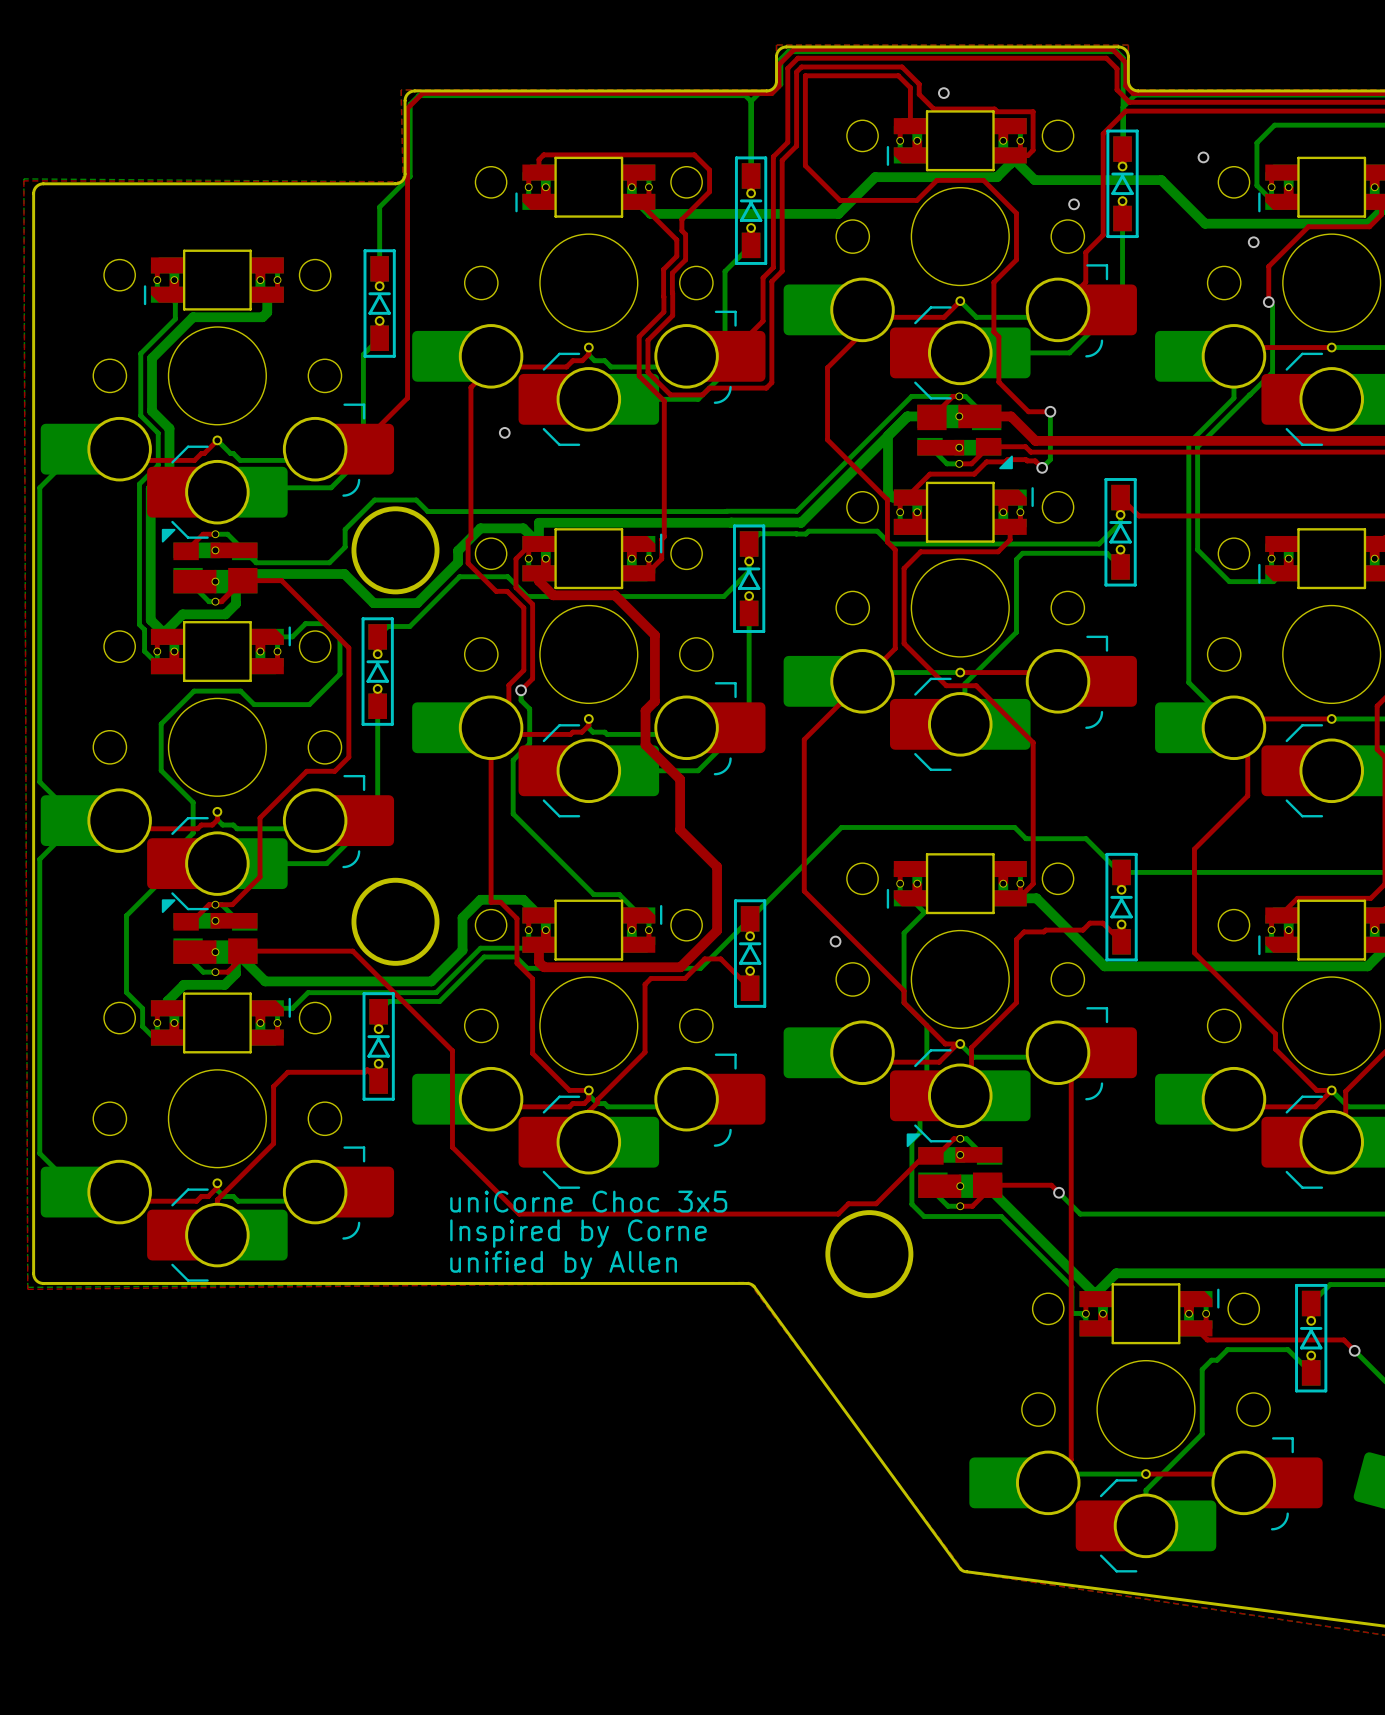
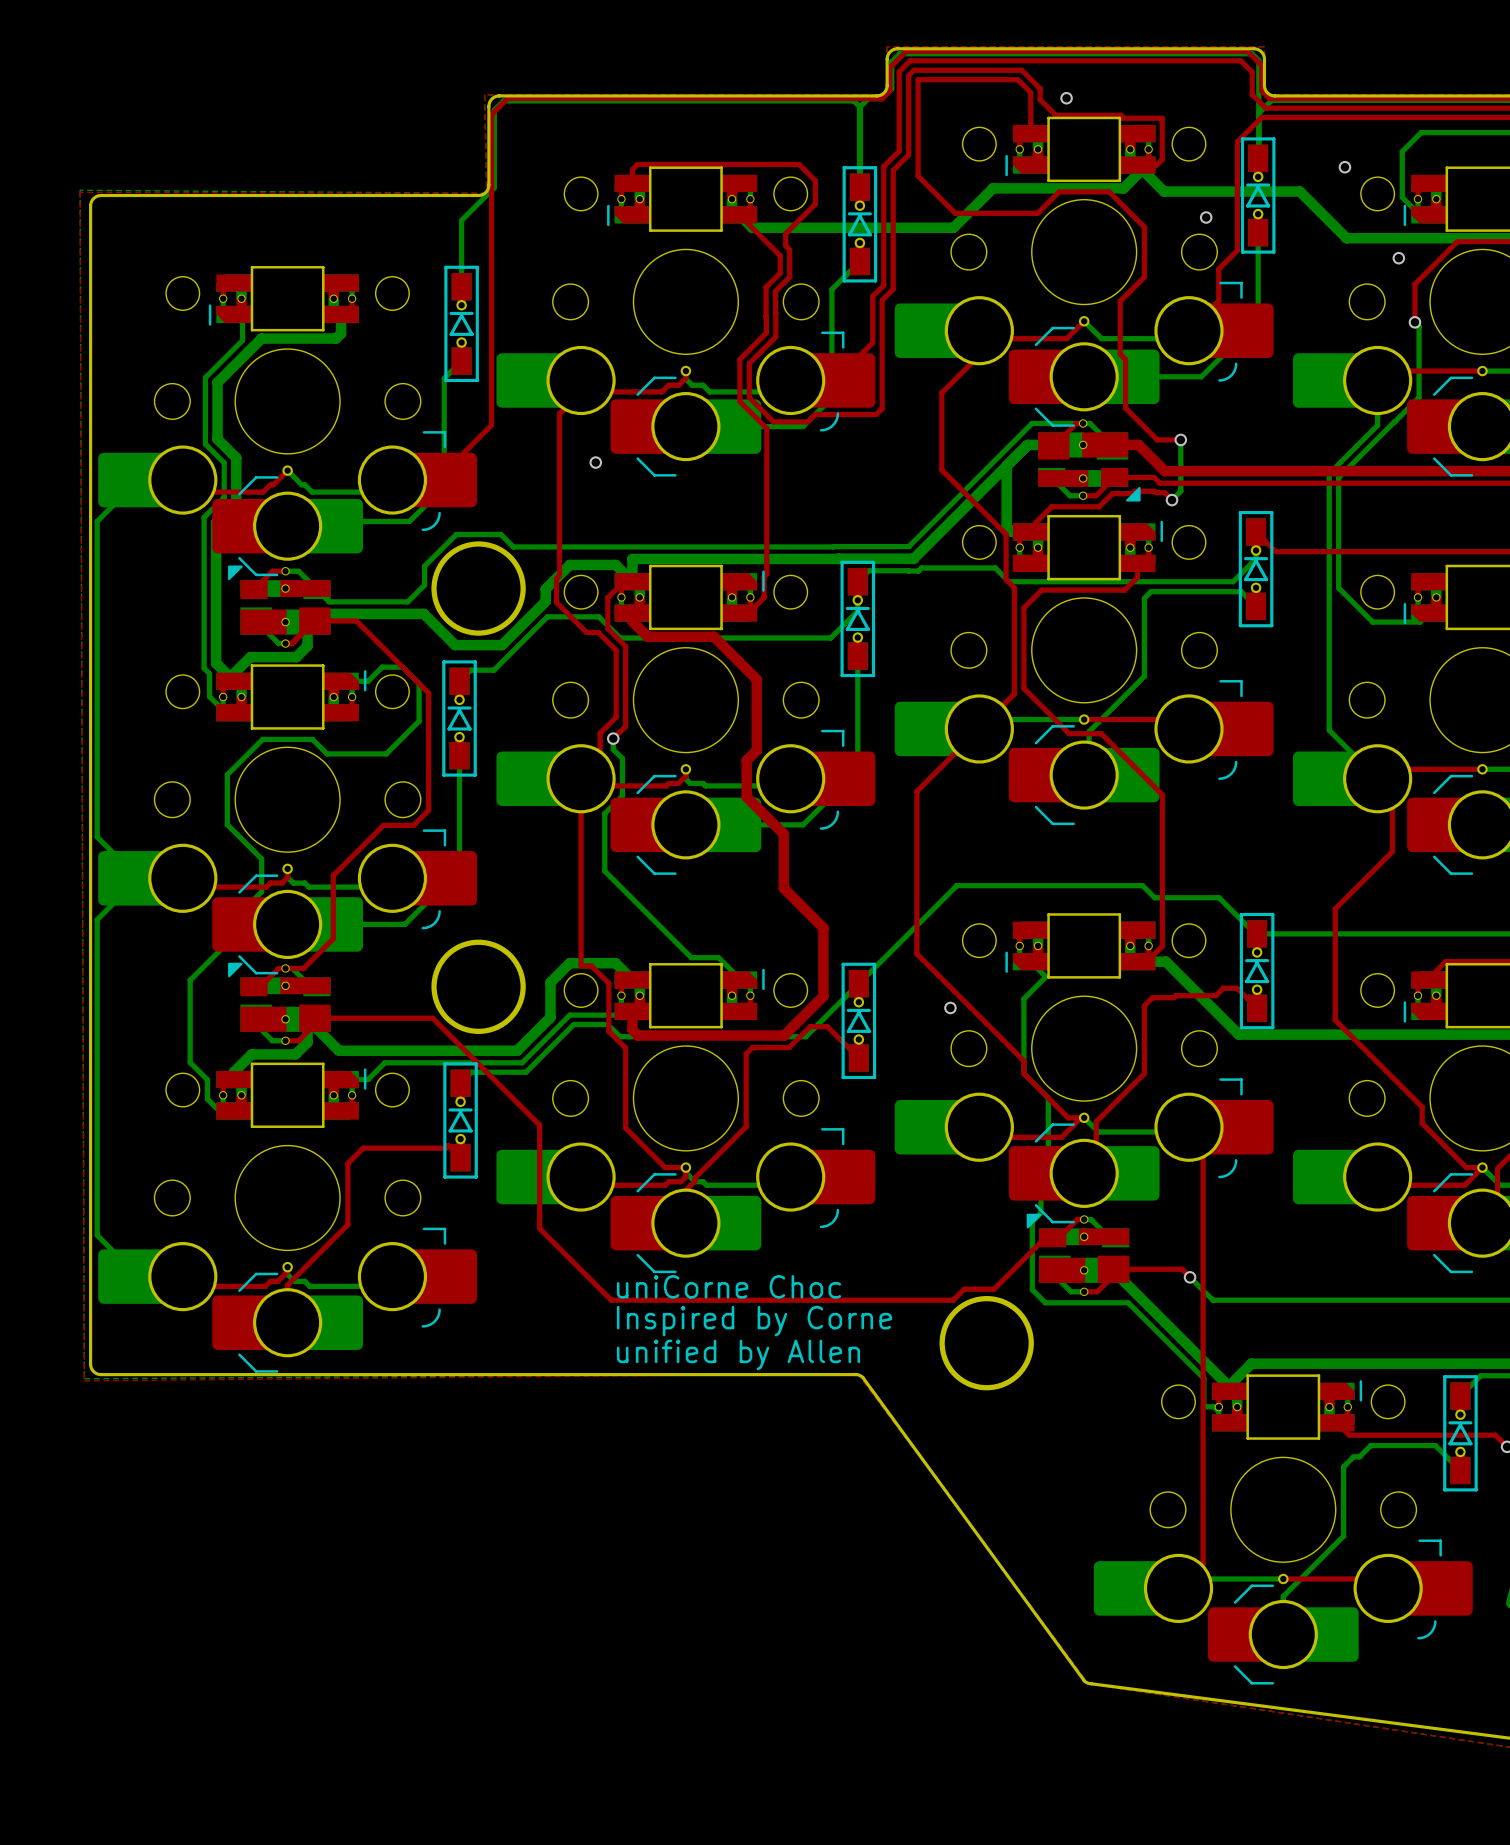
text: uniCorne Choc 3x5 (588, 1201) -> uniCorne Choc (729, 1286)
text position: Inspired by Corne (578, 1233) -> Inspired by Corne (754, 1321)
text position: unified by Allen (563, 1265) -> unified by Allen (738, 1354)

